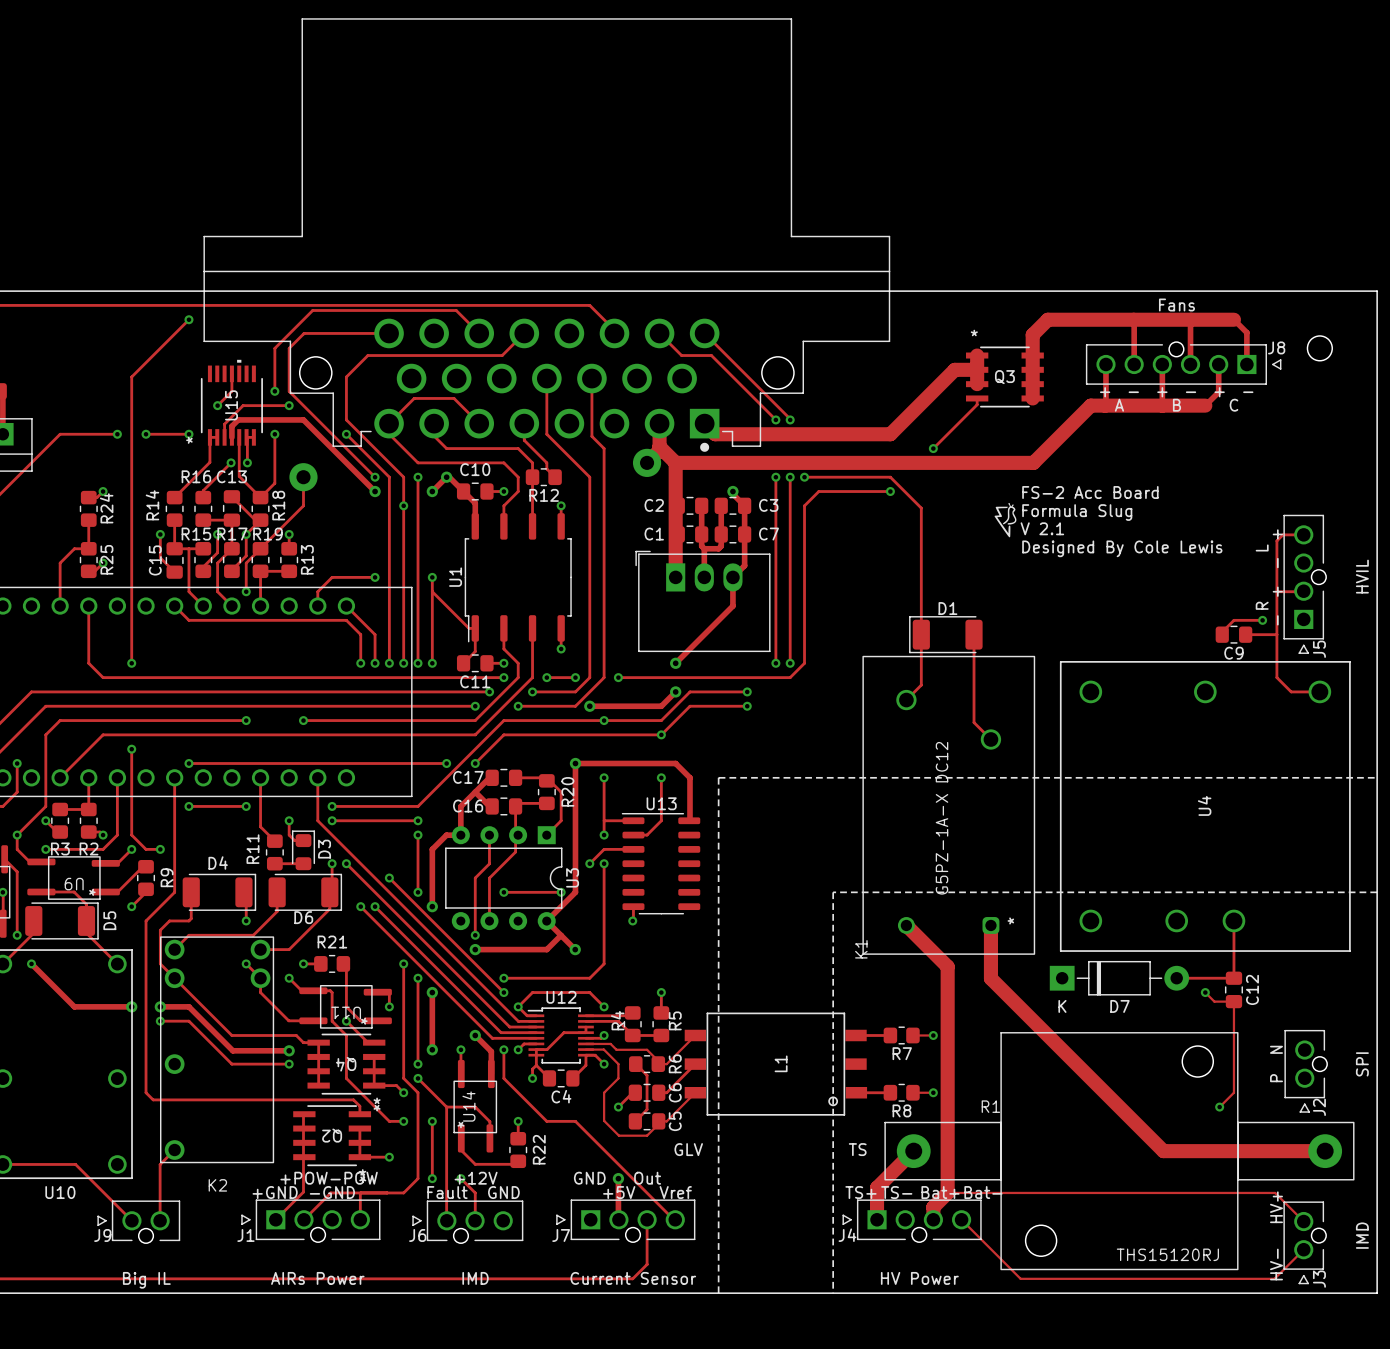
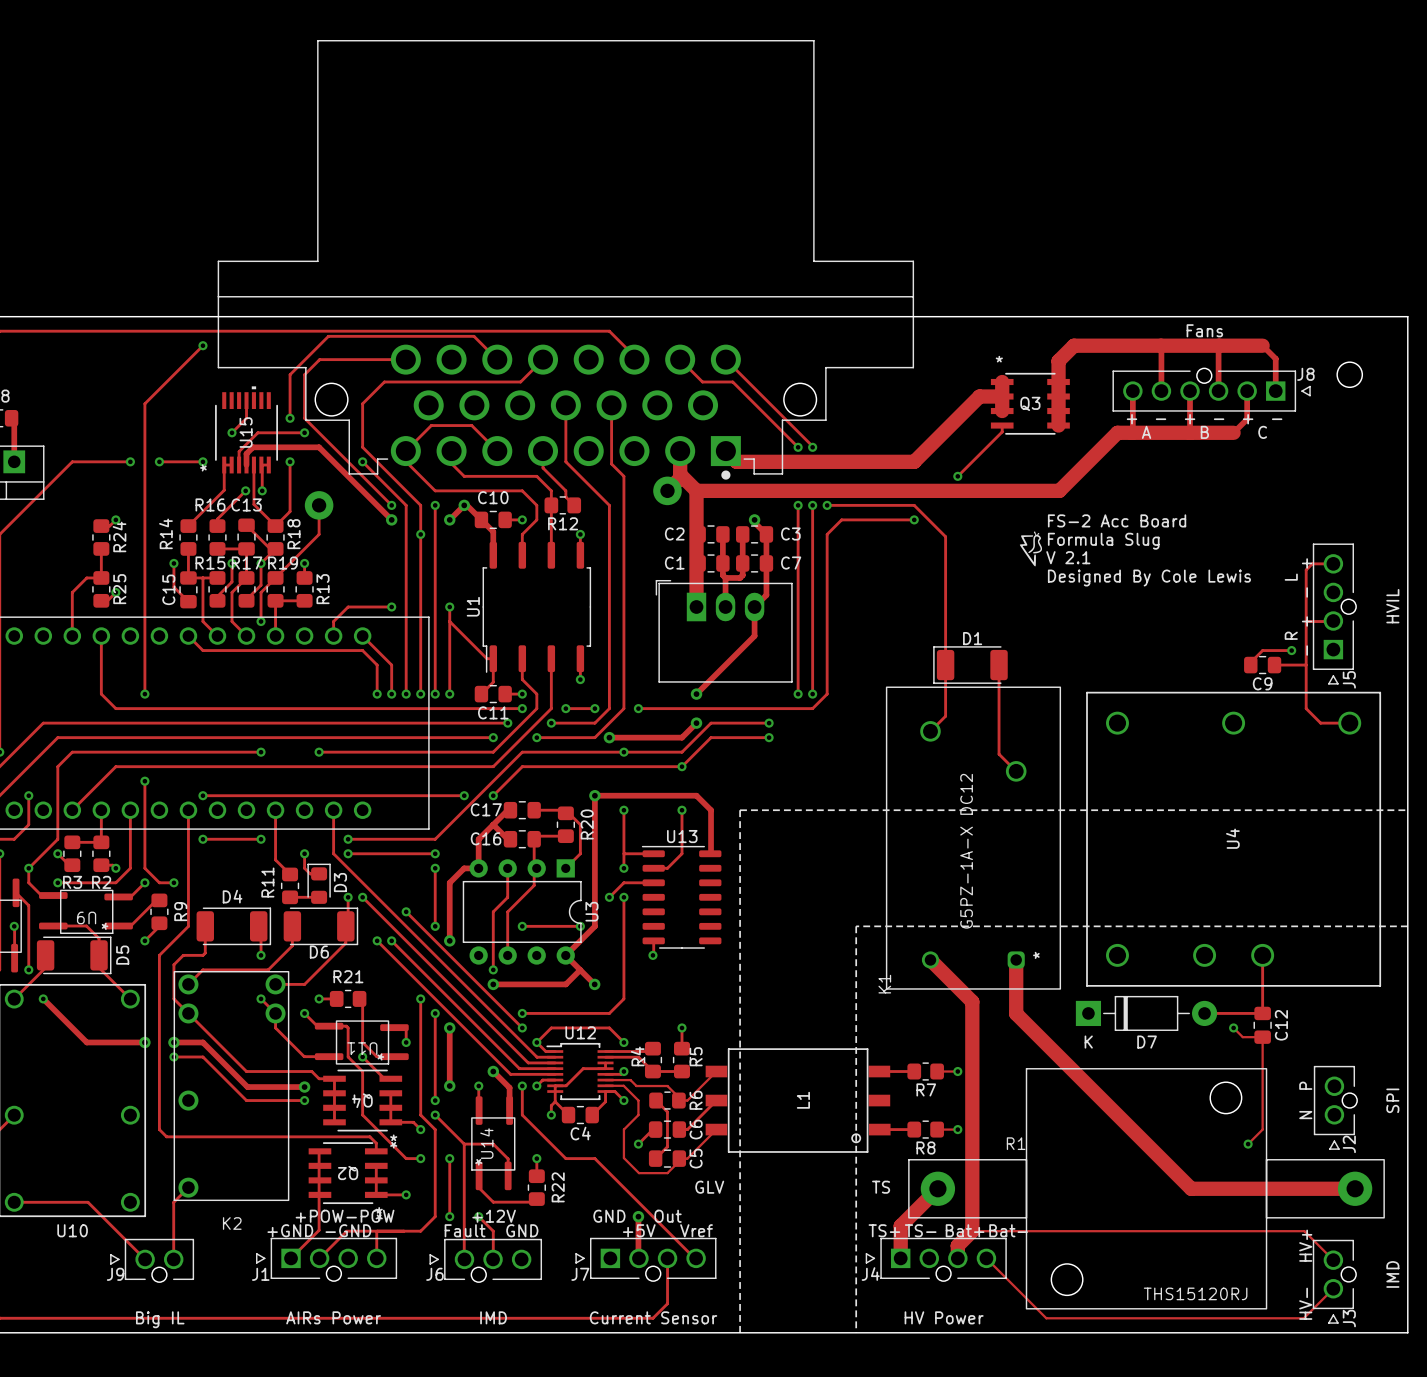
text: N (1276, 1049) -> P (1305, 1085)
text: P (1276, 1078) -> N (1305, 1115)

